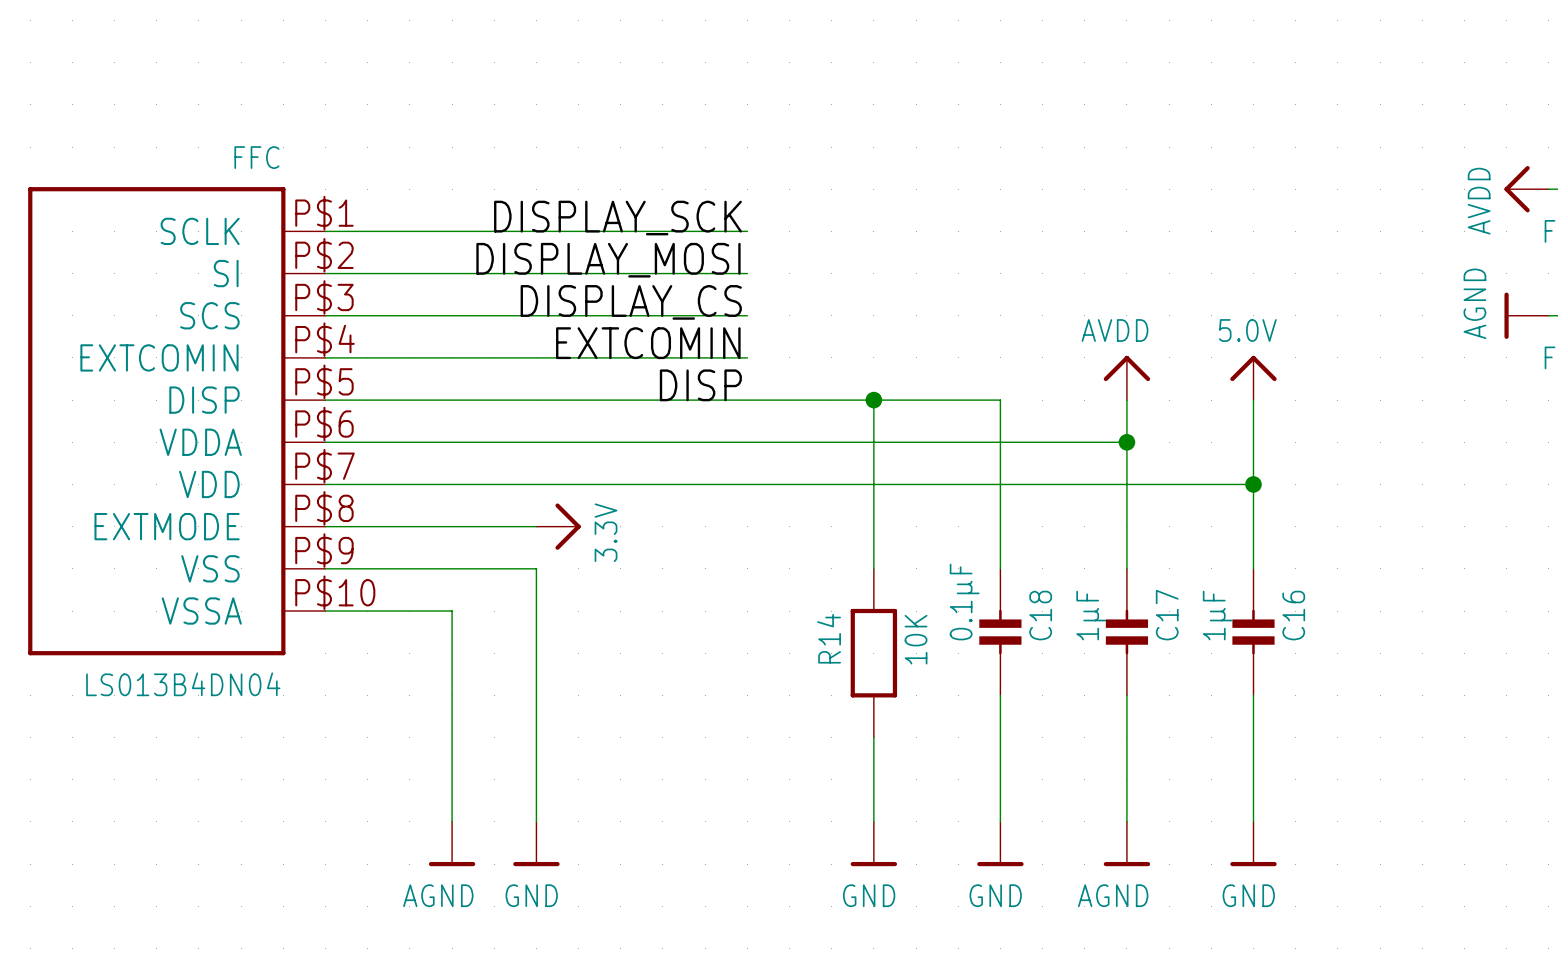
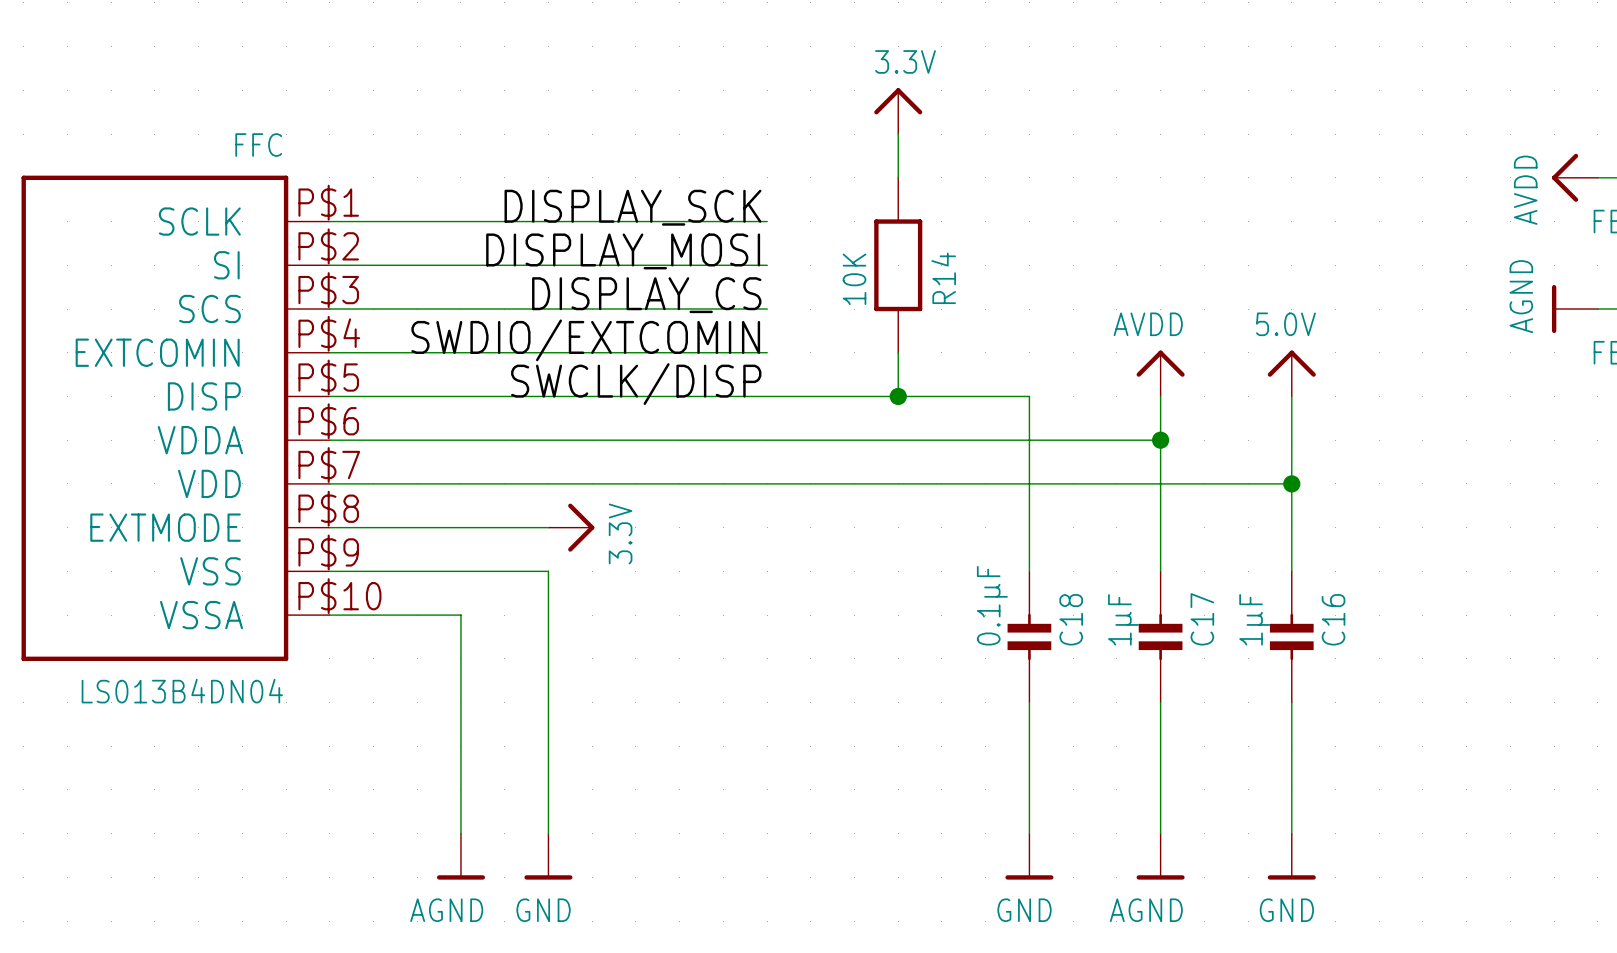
power symbol: none -> 3.3V (898, 111)
wire: none -> (898, 134) (898, 177)
label: EXTCOMIN (648, 343) -> SWDIO/EXTCOMIN (585, 340)
label: DISP (700, 385) -> SWCLK/DISP (636, 384)
wire: (873, 400) (873, 568) -> (898, 396) (898, 352)
R14 name position: R14 (829, 638) -> R14 (943, 278)
R14 value position: 10K (916, 639) -> 10K (854, 279)
R14 position: (873, 653) -> (898, 265)
wire: (873, 737) (873, 821) -> none
power symbol: GND (873, 844) -> none

